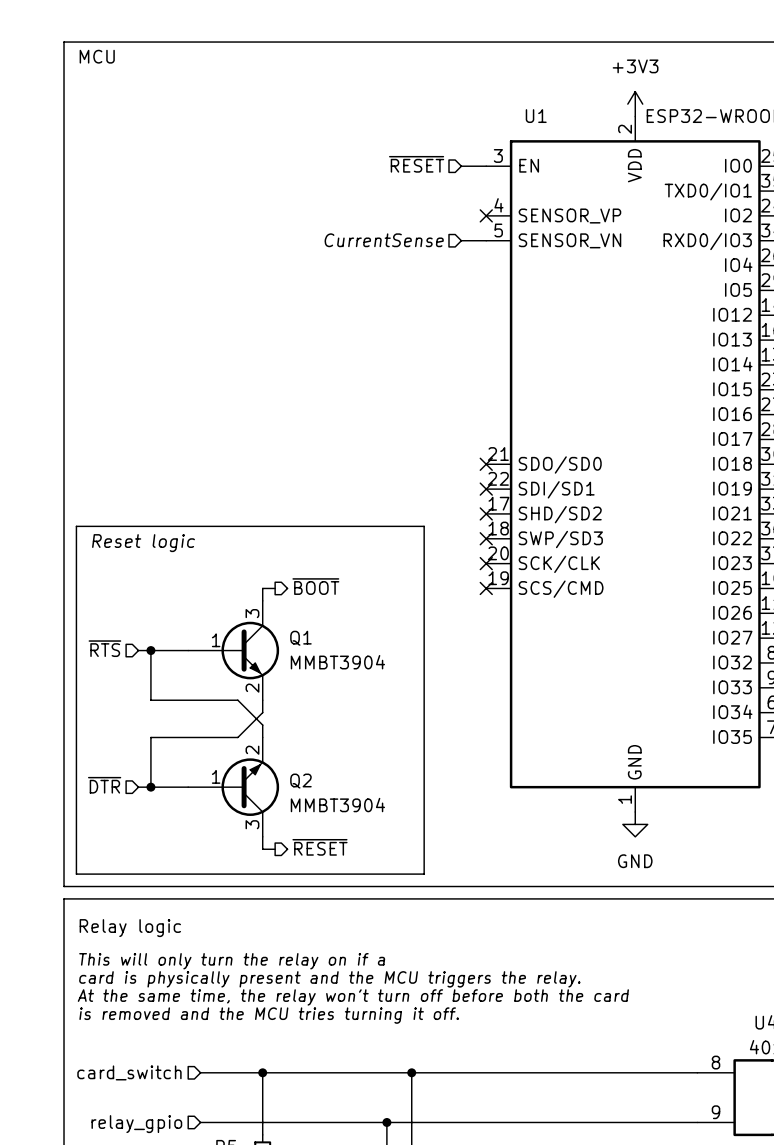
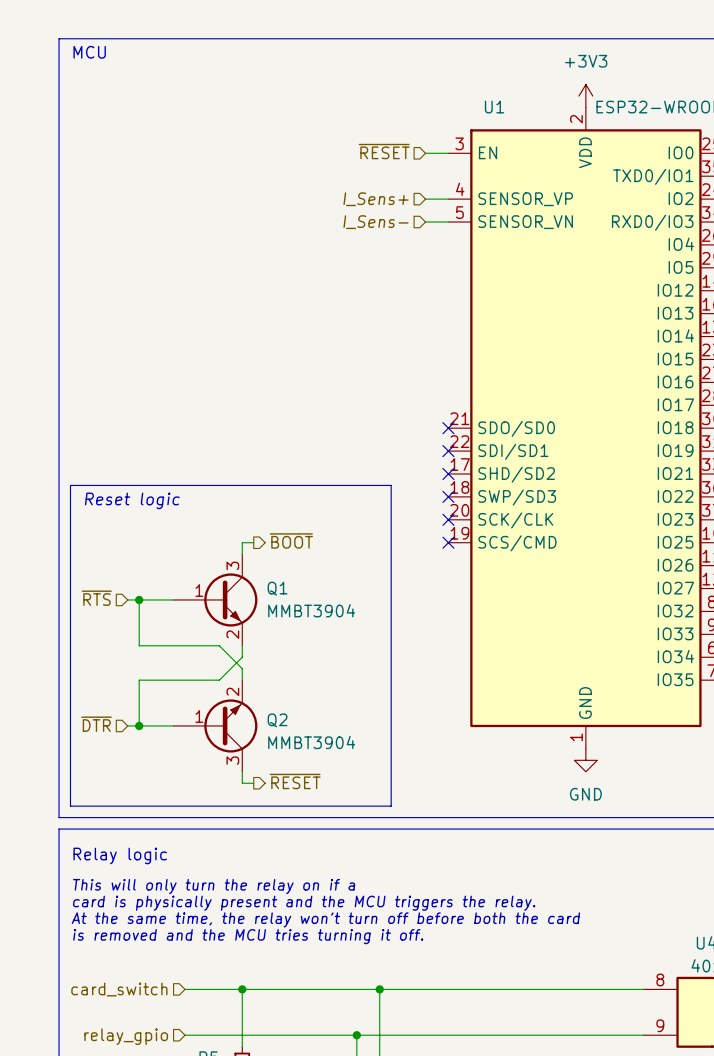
wire: none -> (425, 199) (448, 199)
no-connect mark: (486, 215) -> none
hierarchical label: none -> I_Sens+ (376, 199)
hierarchical label: CurrentSense (384, 240) -> I_Sens- (376, 222)

